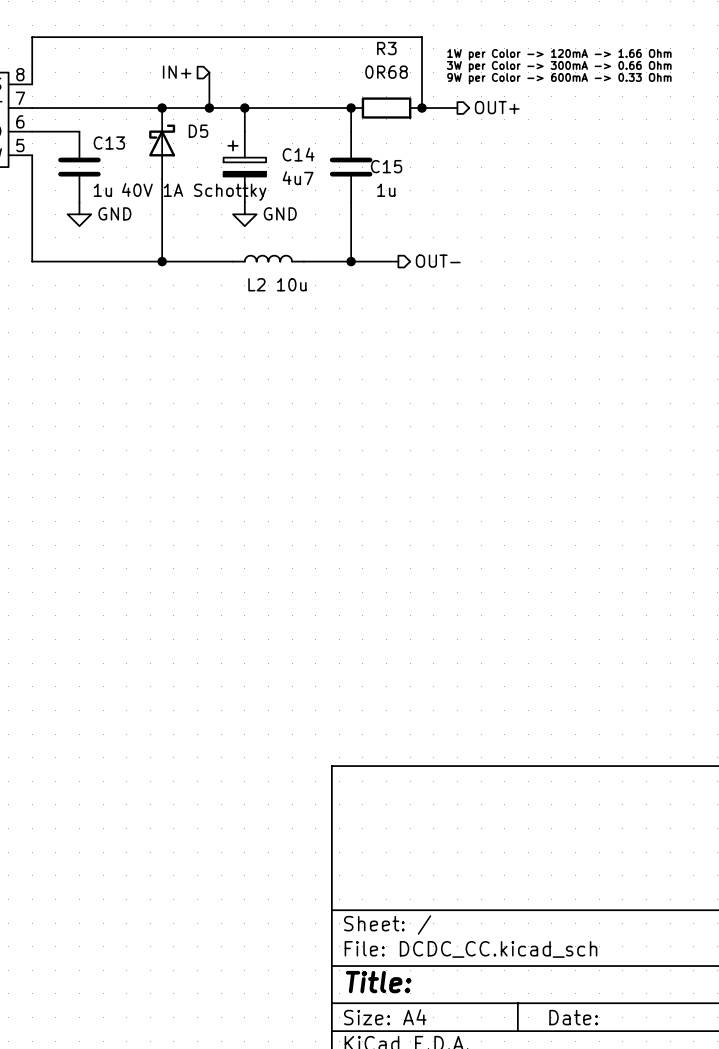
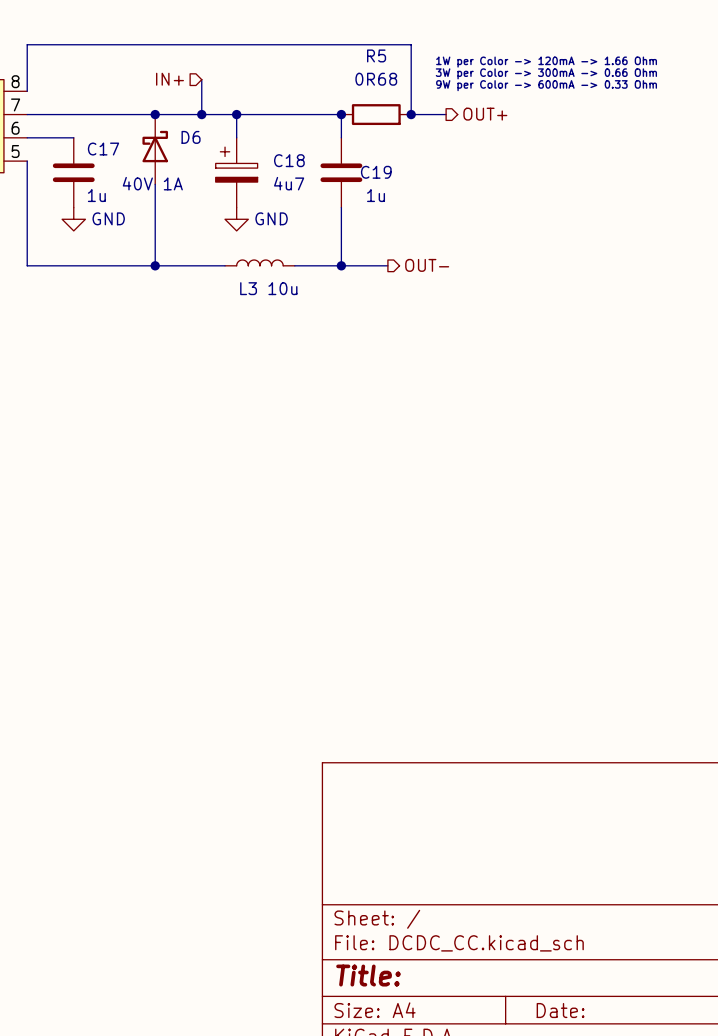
R3 name: R3 (386, 48) -> R5 (376, 55)
D5 name: D5 (198, 131) -> D6 (191, 137)
C13 name: C13 (109, 143) -> C17 (103, 149)
C14 name: C14 (298, 154) -> C18 (289, 160)
C15 name: C15 (386, 166) -> C19 (376, 172)
D5 value: 40V 1A Schottky (194, 191) -> 40V 1A (152, 183)
L2 name: L2 (256, 284) -> L3 (248, 288)

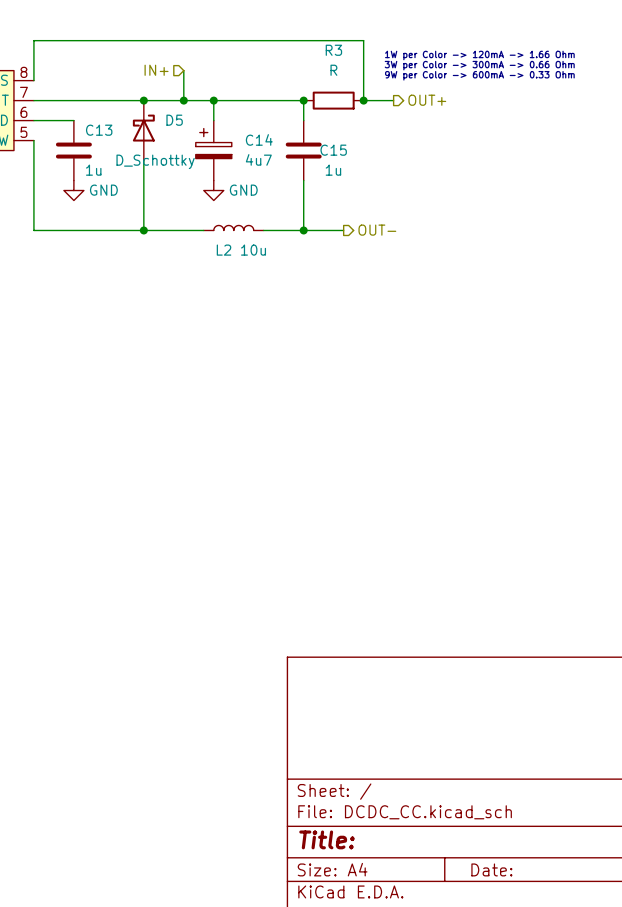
R5 name: R5 (376, 55) -> R3 (333, 50)
R5 value: 0R68 (376, 79) -> R (333, 70)
D6 name: D6 (191, 137) -> D5 (174, 120)
C17 name: C17 (103, 149) -> C13 (99, 130)
C18 name: C18 (289, 160) -> C14 (259, 139)
C19 name: C19 (376, 172) -> C15 (333, 150)
D6 value: 40V 1A (152, 183) -> D_Schottky (155, 161)
L3 name: L3 (248, 288) -> L2 (224, 250)

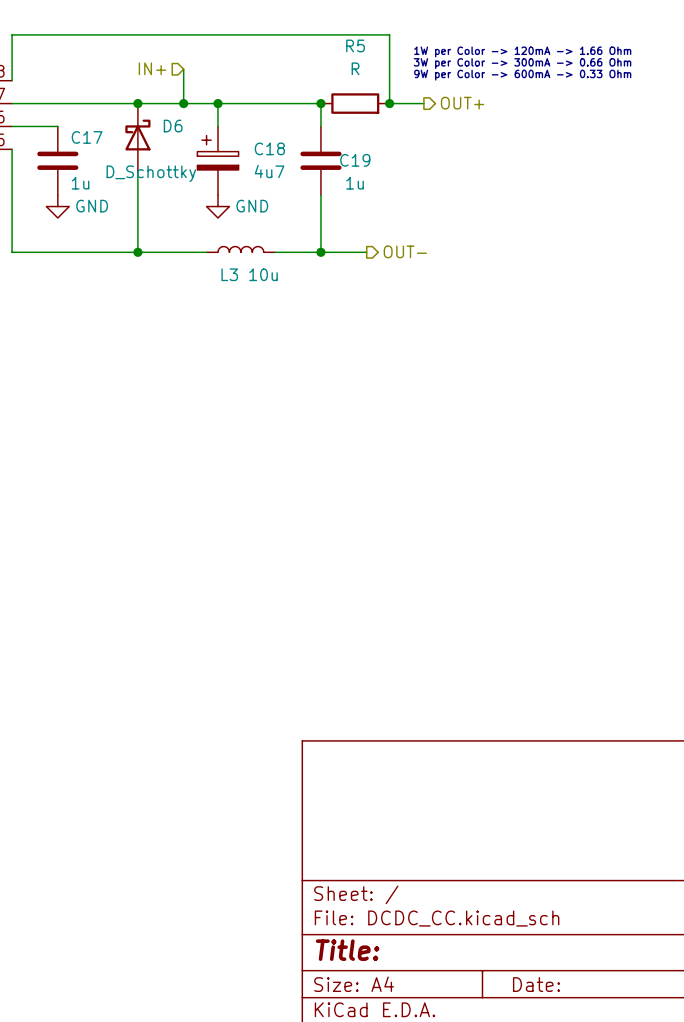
R3 name: R3 (333, 50) -> R5 (355, 45)
D5 name: D5 (174, 120) -> D6 (173, 126)
C13 name: C13 (99, 130) -> C17 (87, 137)
C14 name: C14 (259, 139) -> C18 (269, 148)
C15 name: C15 (333, 150) -> C19 (355, 160)
L2 name: L2 (224, 250) -> L3 (229, 274)

